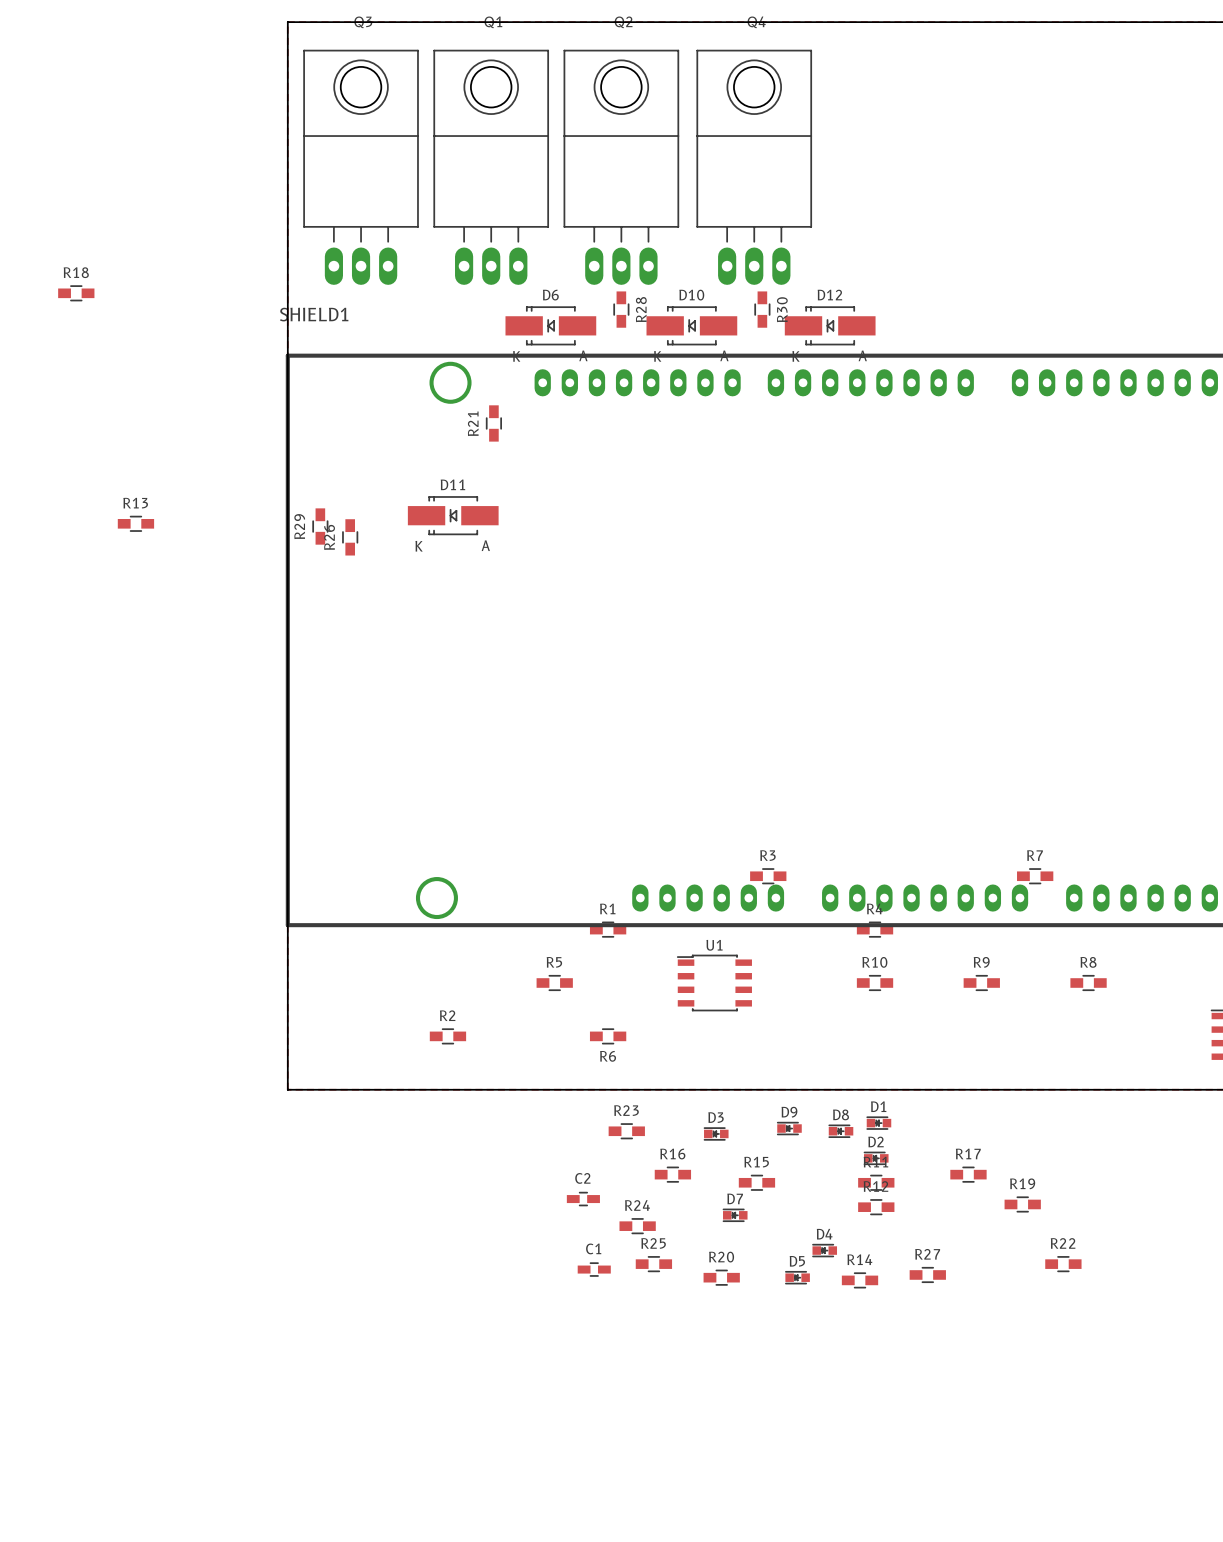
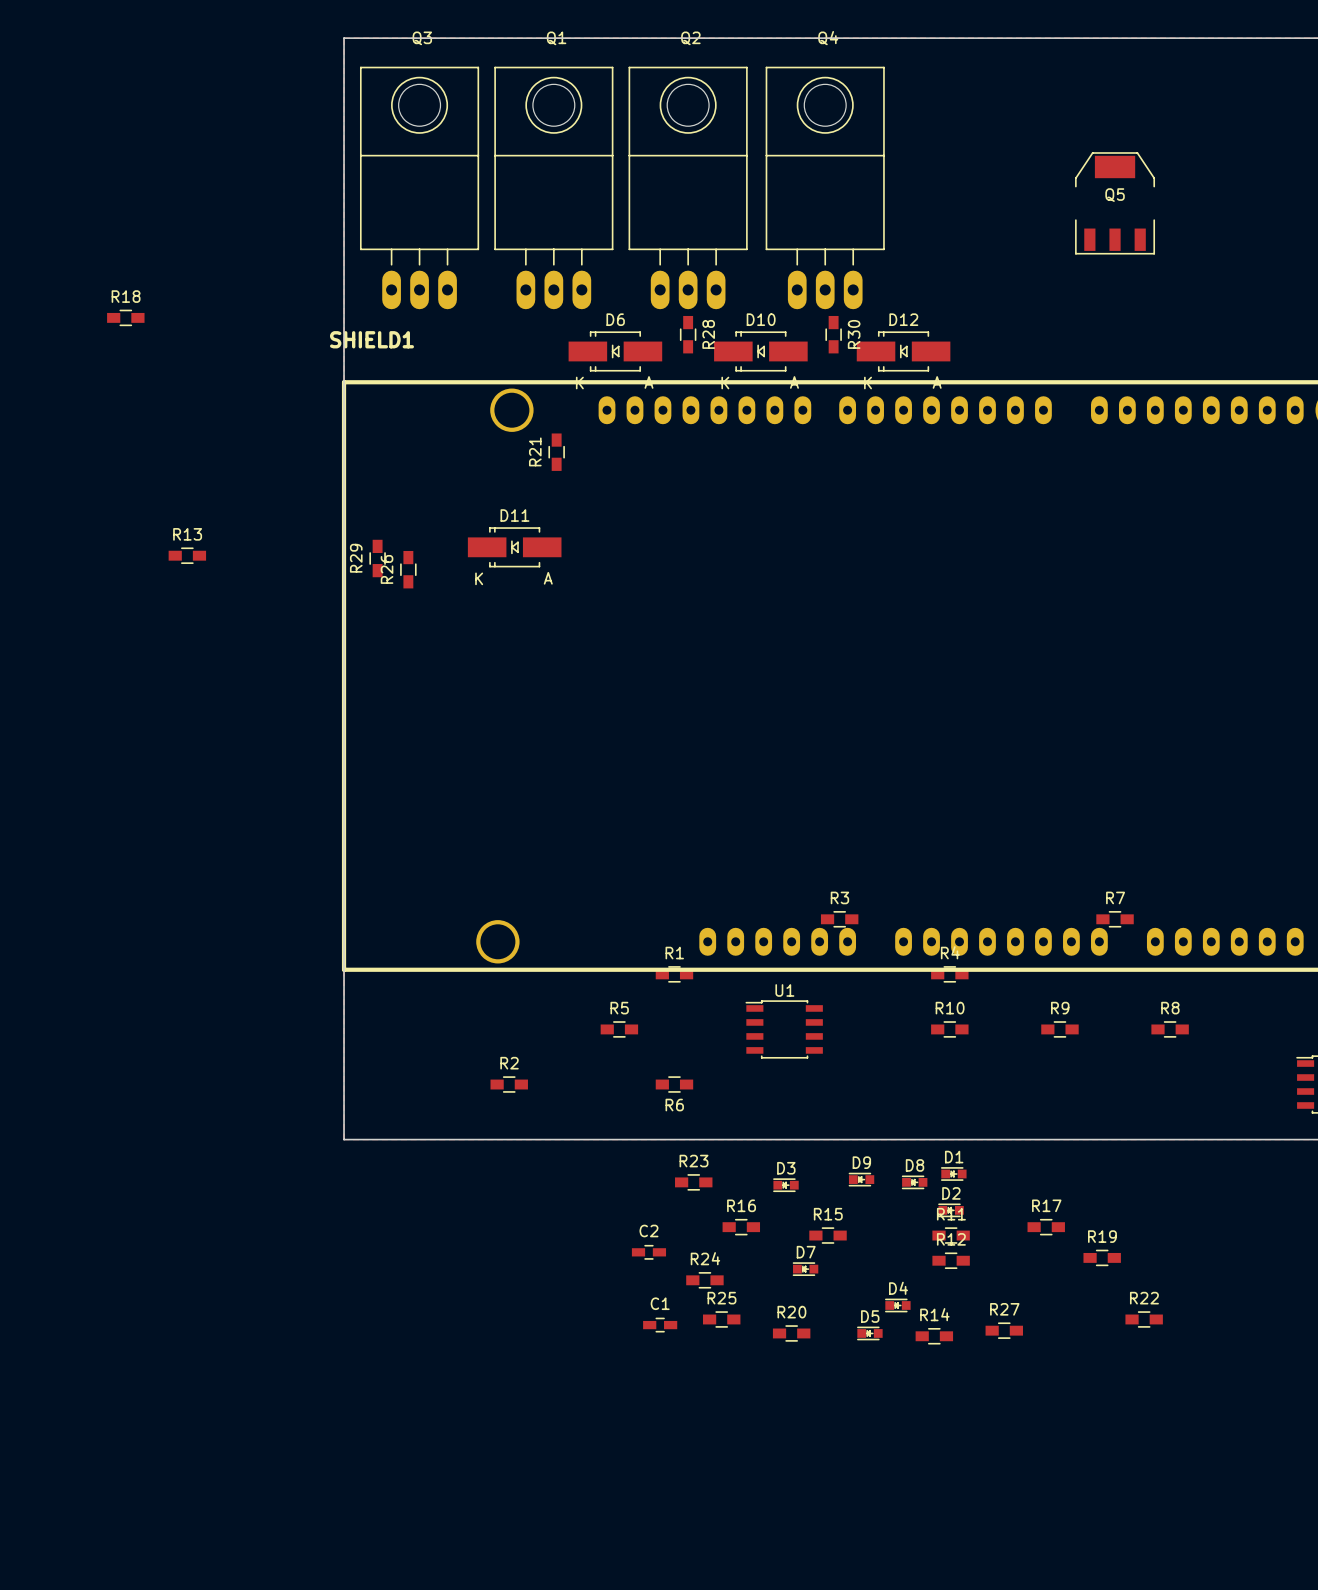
Q5: none -> (1115, 203)

